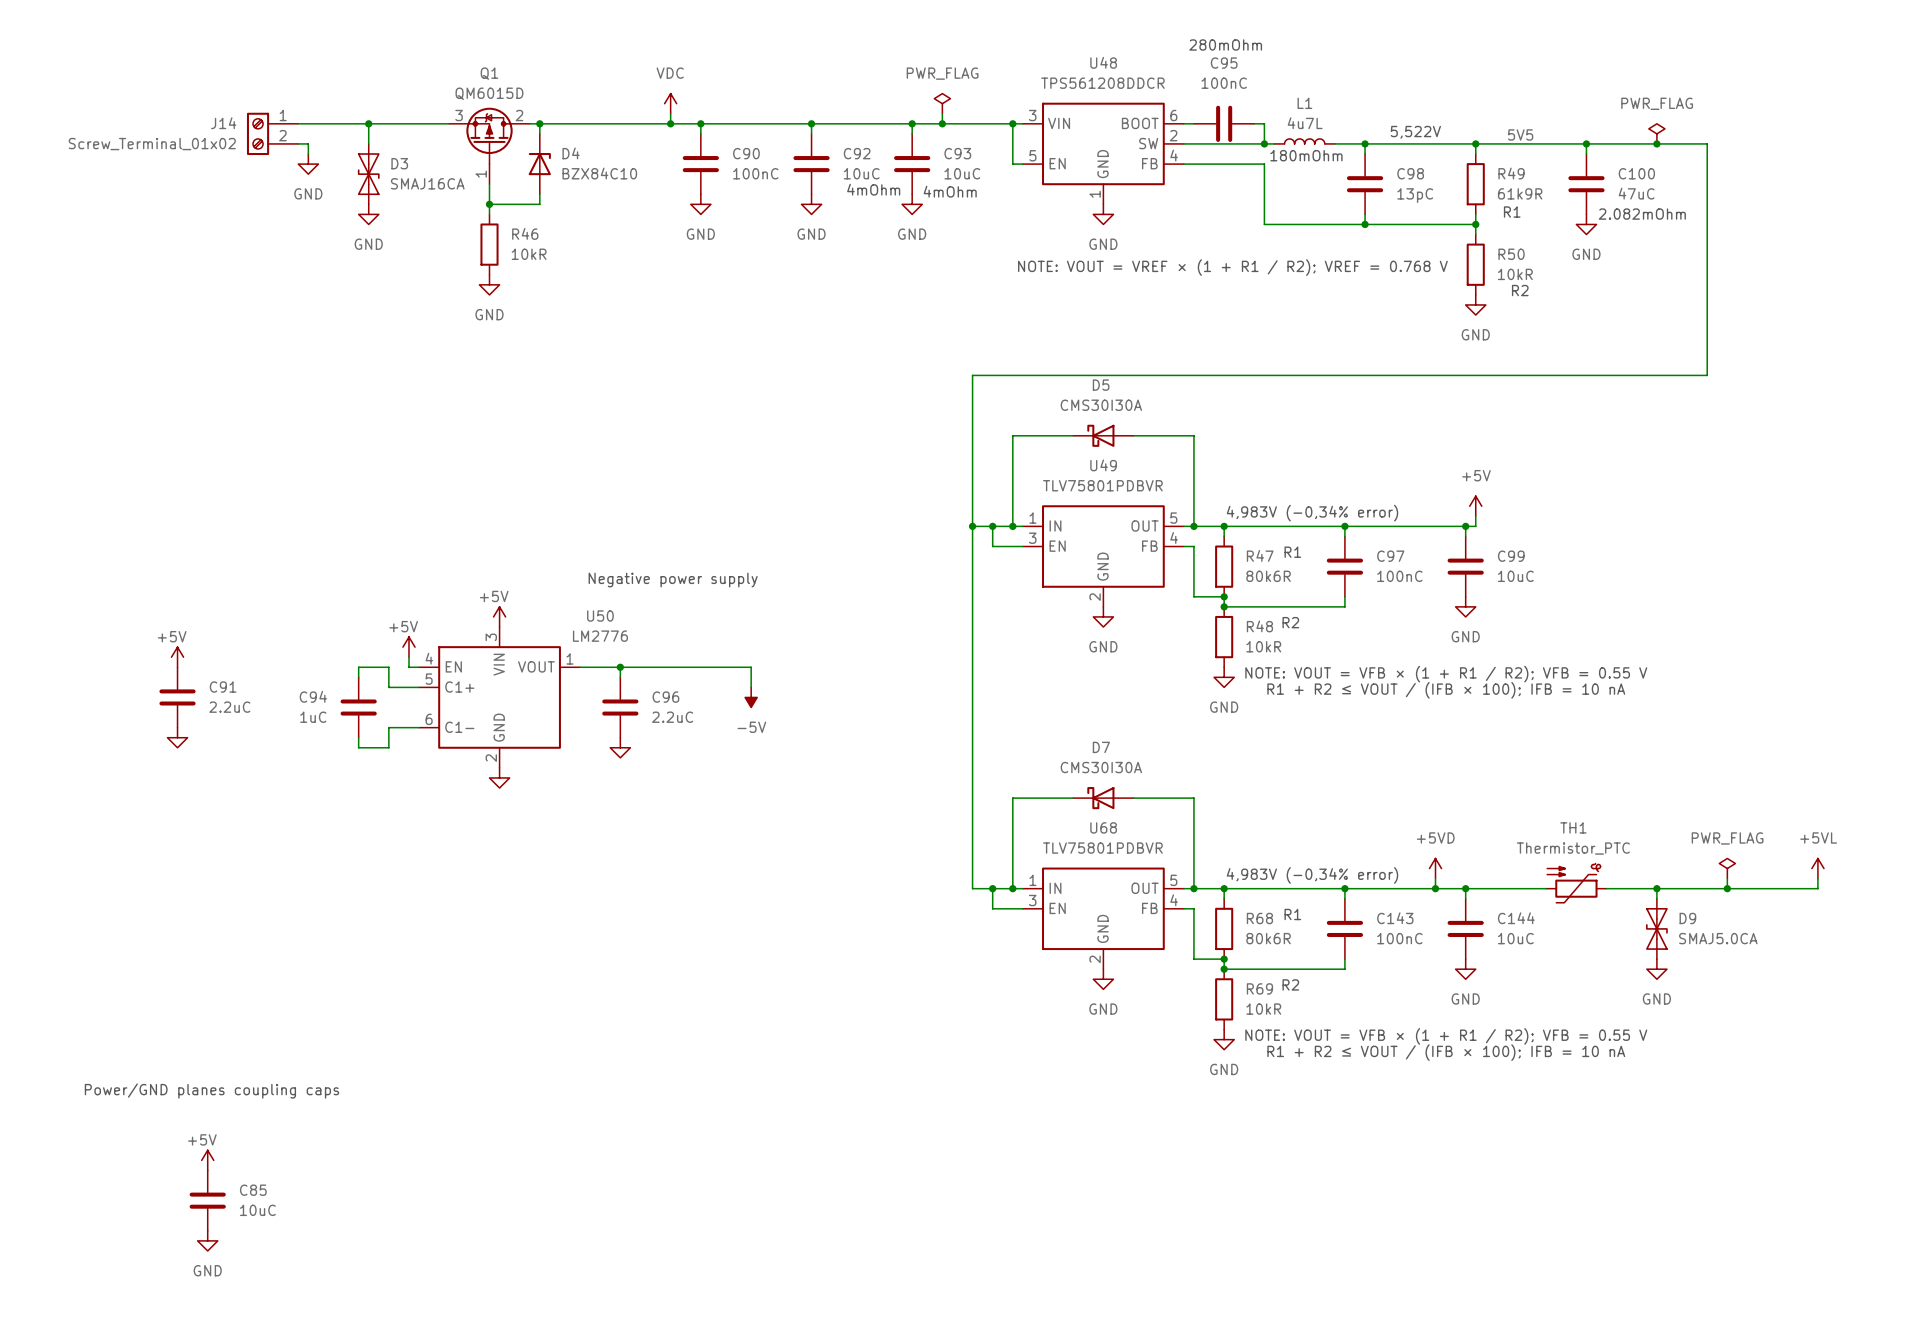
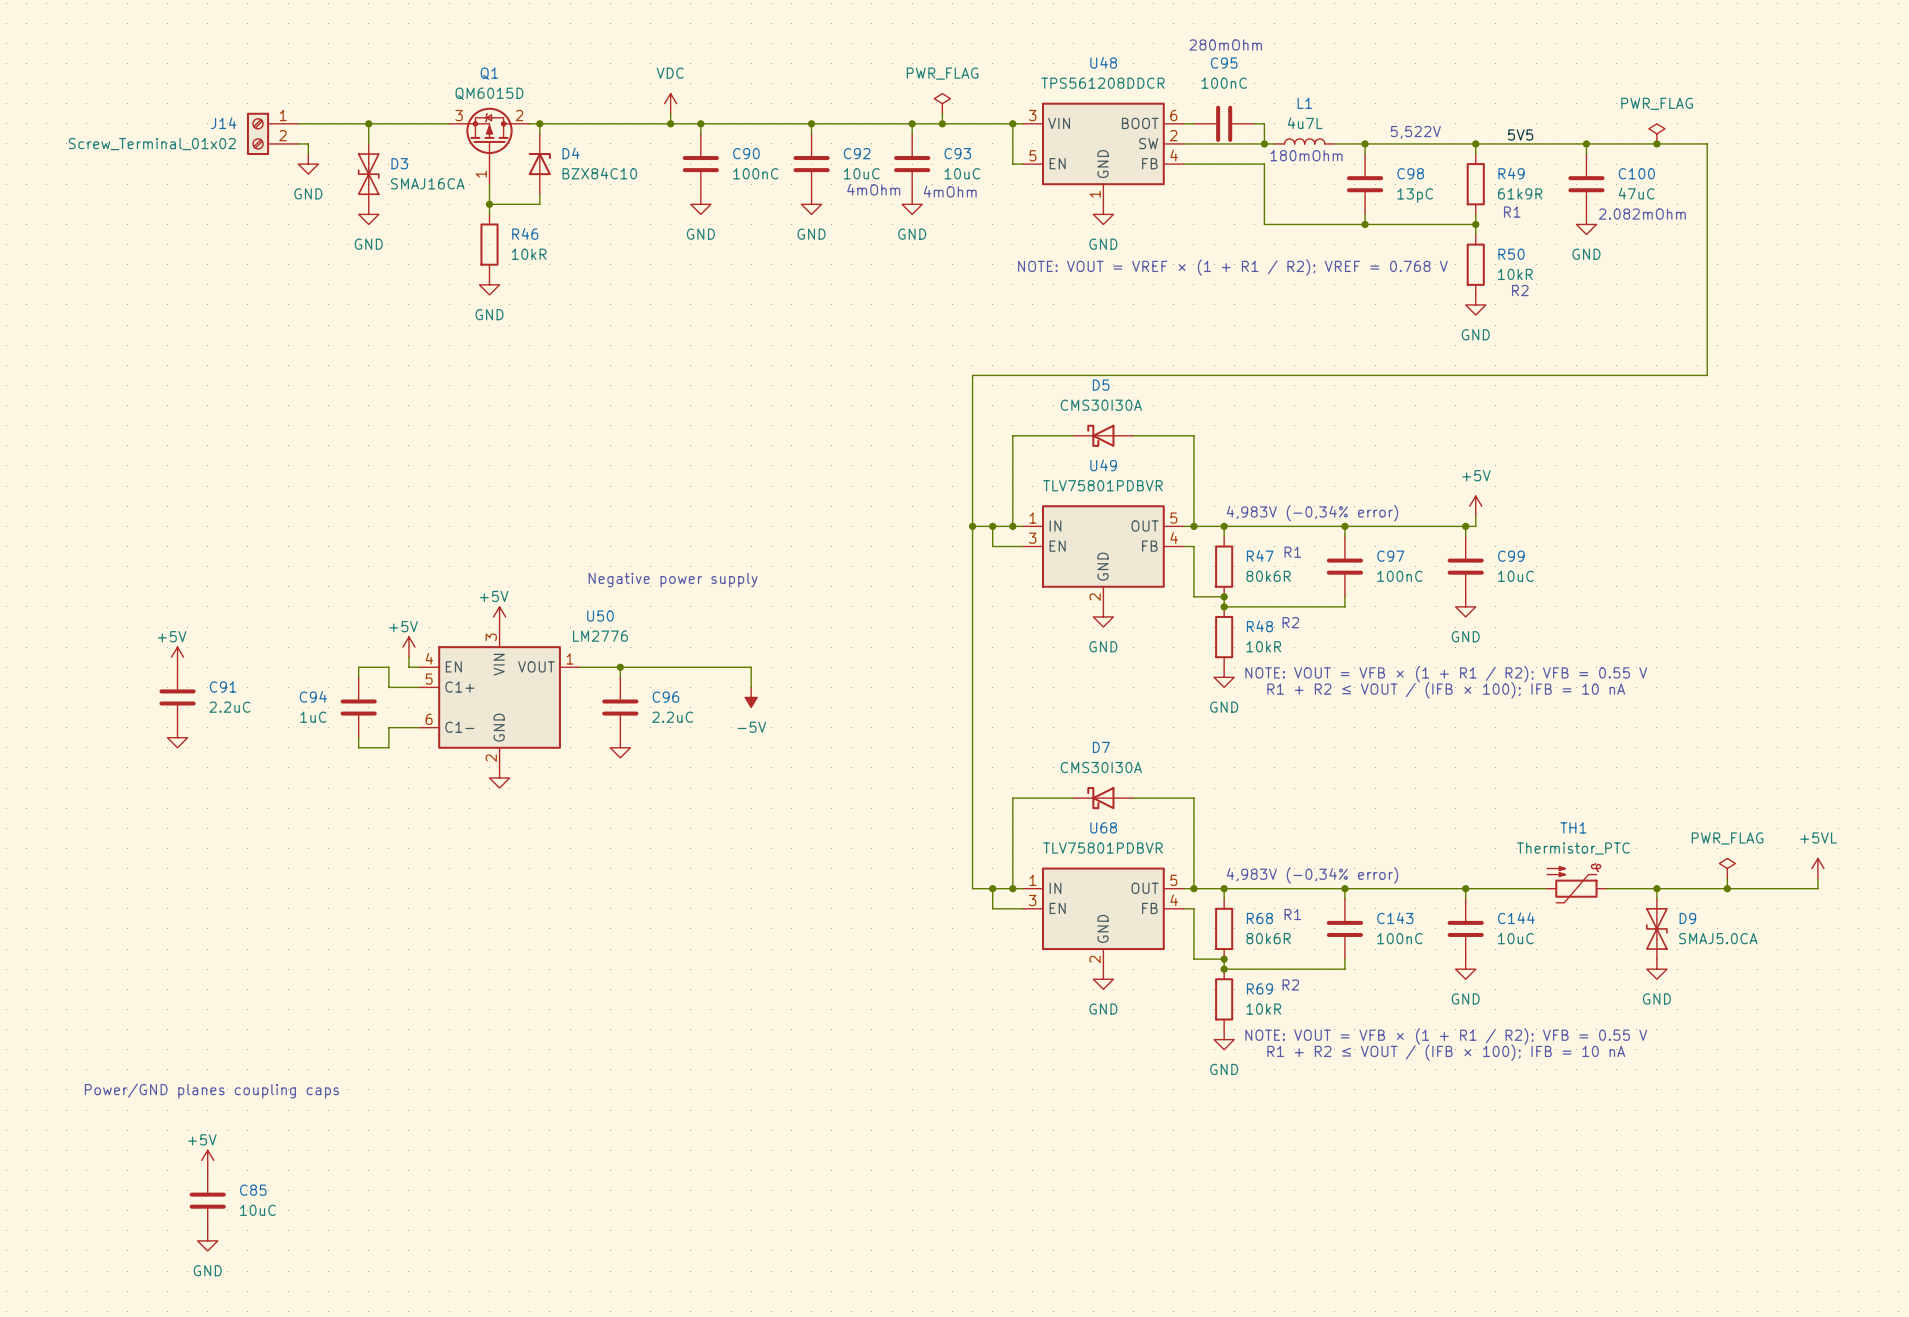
power symbol: +5VD (1435, 868) -> none
wire: (1435, 878) (1435, 888) -> none
junction: (1435, 888) -> none

